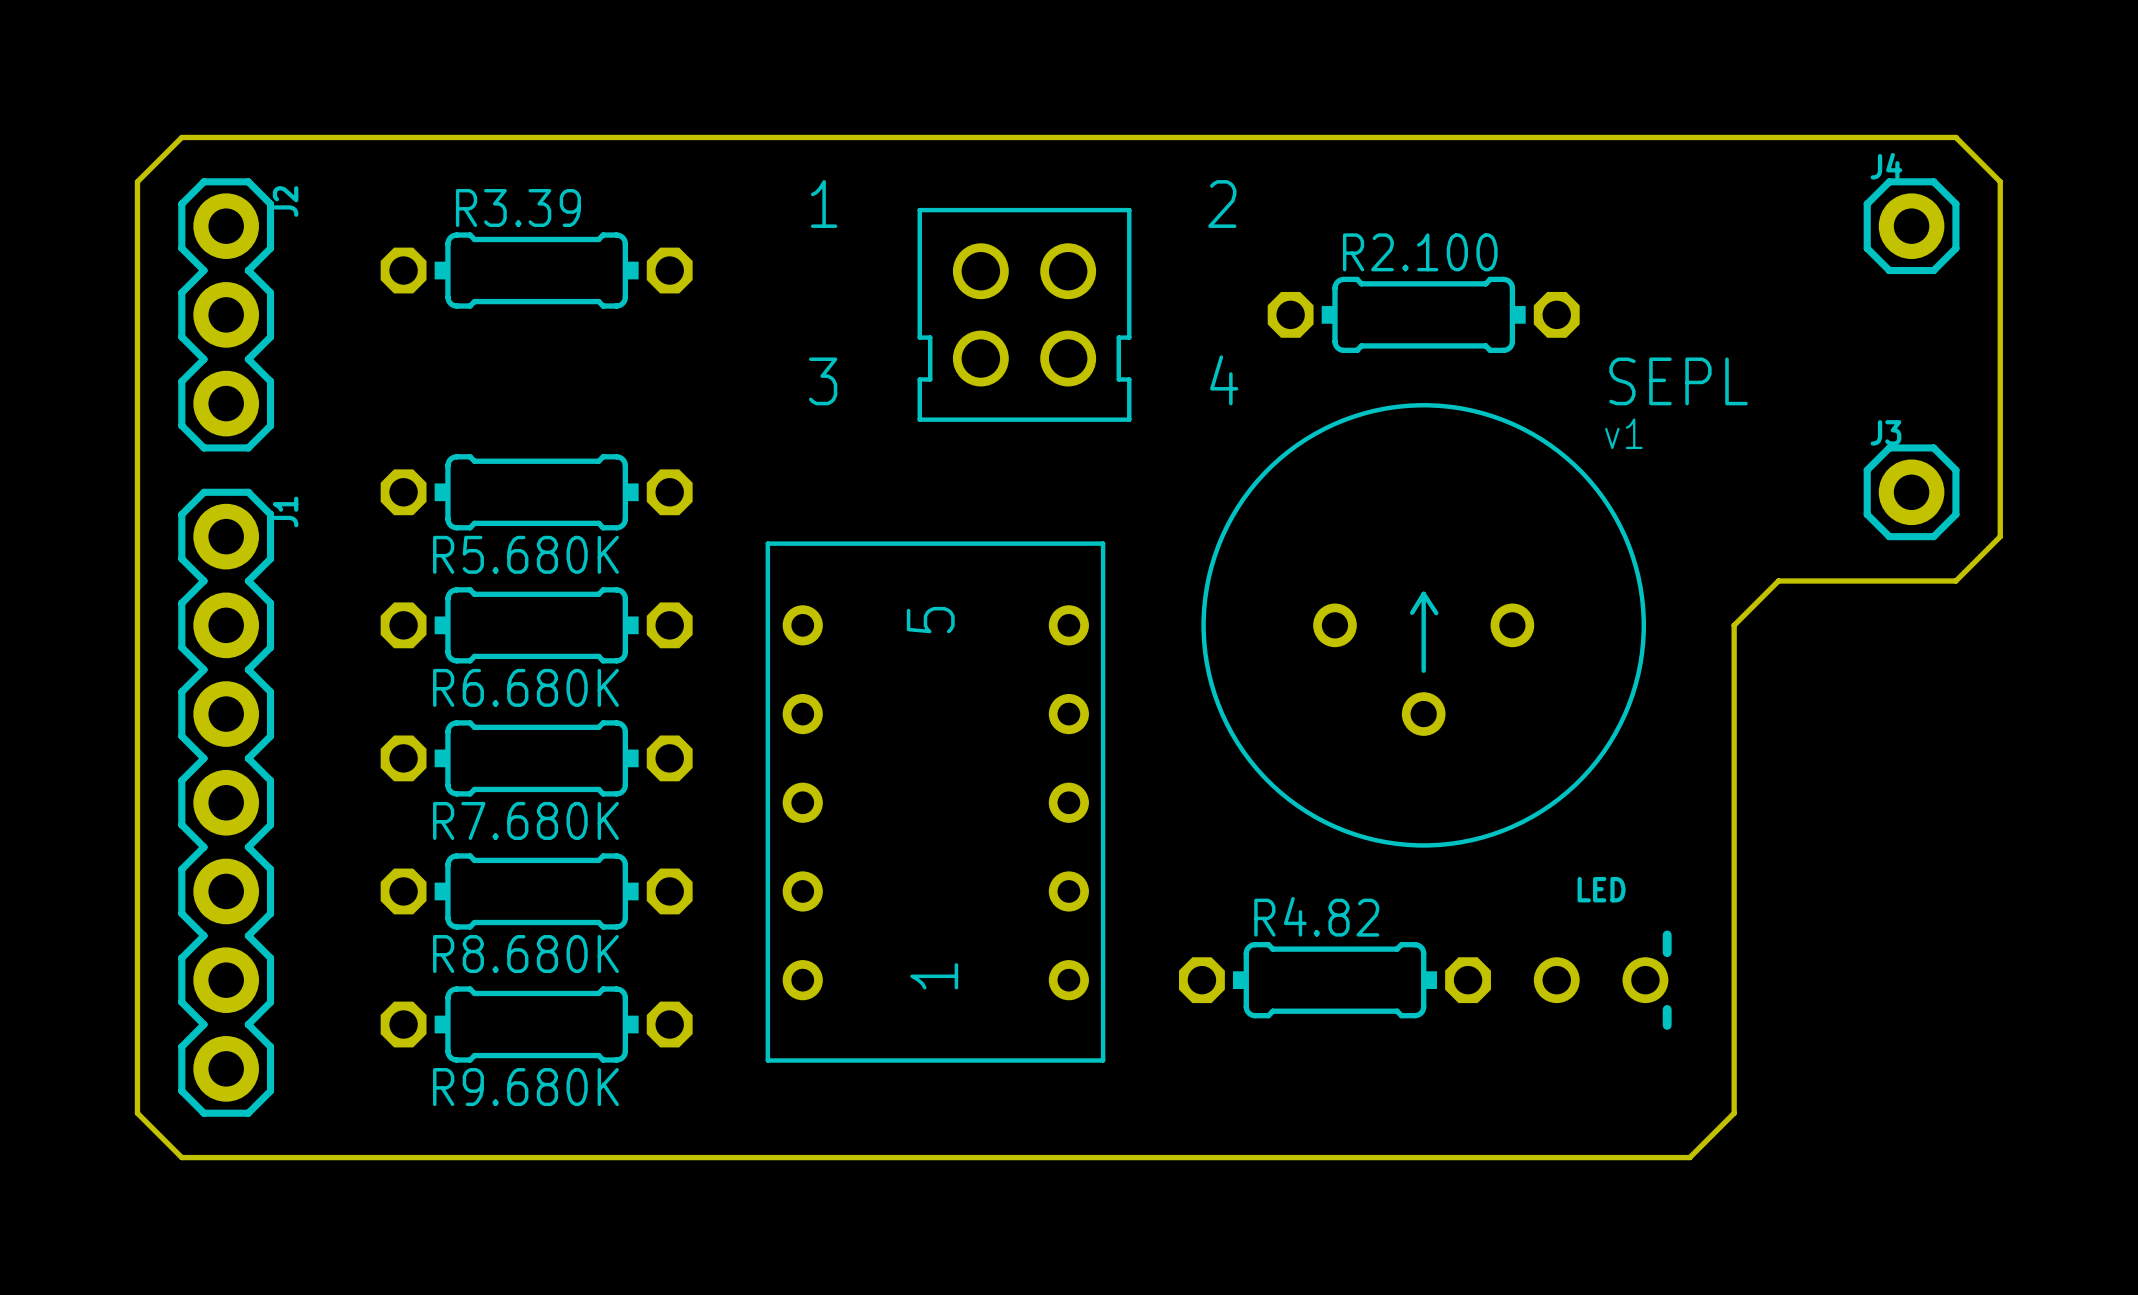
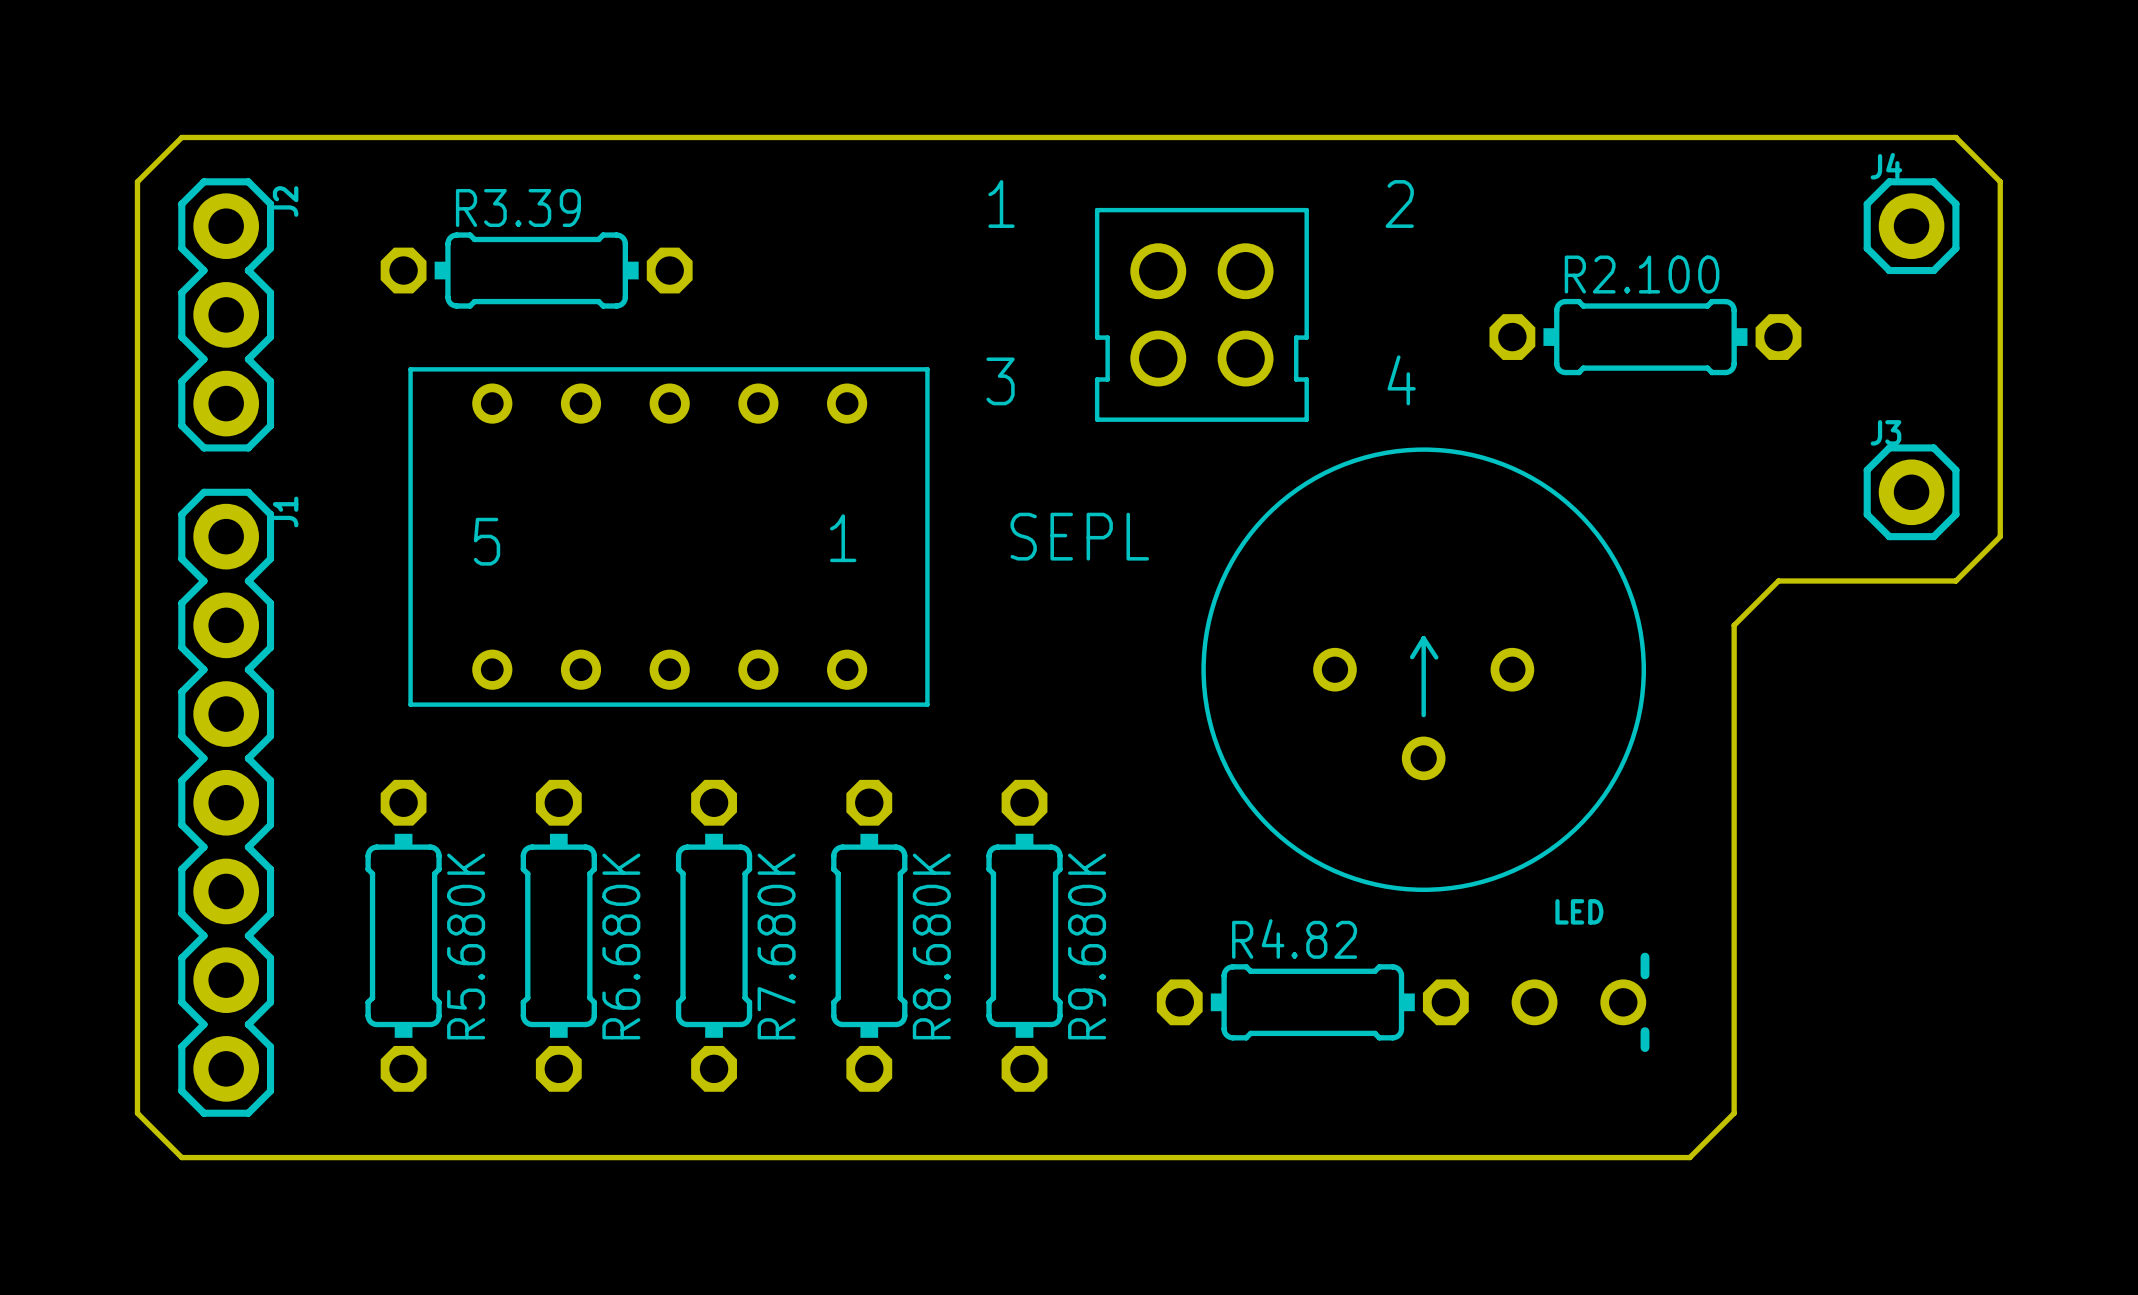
part position: (1024, 314) -> (1201, 314)
R2.100 position: (1423, 314) -> (1645, 337)
text position: SEPL (1678, 381) -> SEPL (1079, 536)
text: v1 (1623, 433) -> none
R5.680K rotation: 0° (536, 492) -> 90° clockwise (403, 935)
R5.680K position: (536, 492) -> (403, 935)
part: none -> (669, 536)
R5.680K name position: R5.680K (525, 554) -> R5.680K (466, 946)
R6.680K rotation: 0° (536, 625) -> 90° clockwise (558, 935)
R6.680K position: (536, 625) -> (558, 935)
part position: (1423, 625) -> (1423, 669)
R6.680K name position: R6.680K (525, 687) -> R6.680K (621, 946)
R7.680K rotation: 0° (536, 758) -> 90° clockwise (714, 935)
R7.680K position: (536, 758) -> (714, 935)
part: (935, 802) -> none
R7.680K name position: R7.680K (525, 820) -> R7.680K (776, 946)
R8.680K rotation: 0° (536, 891) -> 90° clockwise (869, 935)
R8.680K position: (536, 891) -> (869, 935)
R8.680K name position: R8.680K (525, 954) -> R8.680K (931, 946)
R4.82 position: (1334, 980) -> (1312, 1002)
LED position: (1602, 980) -> (1580, 1002)
R9.680K rotation: 0° (536, 1024) -> 90° clockwise (1024, 935)
R9.680K position: (536, 1024) -> (1024, 935)
R9.680K name position: R9.680K (525, 1087) -> R9.680K (1087, 946)

